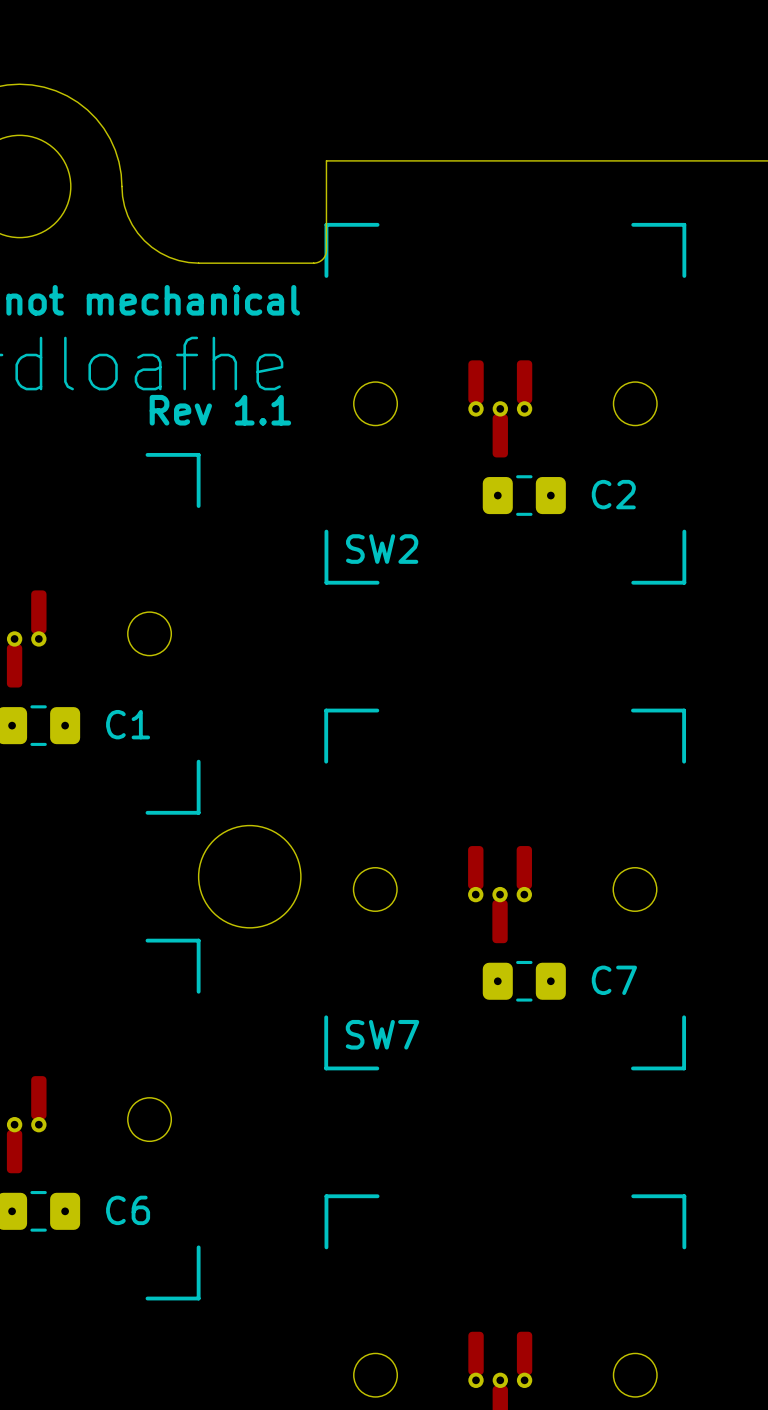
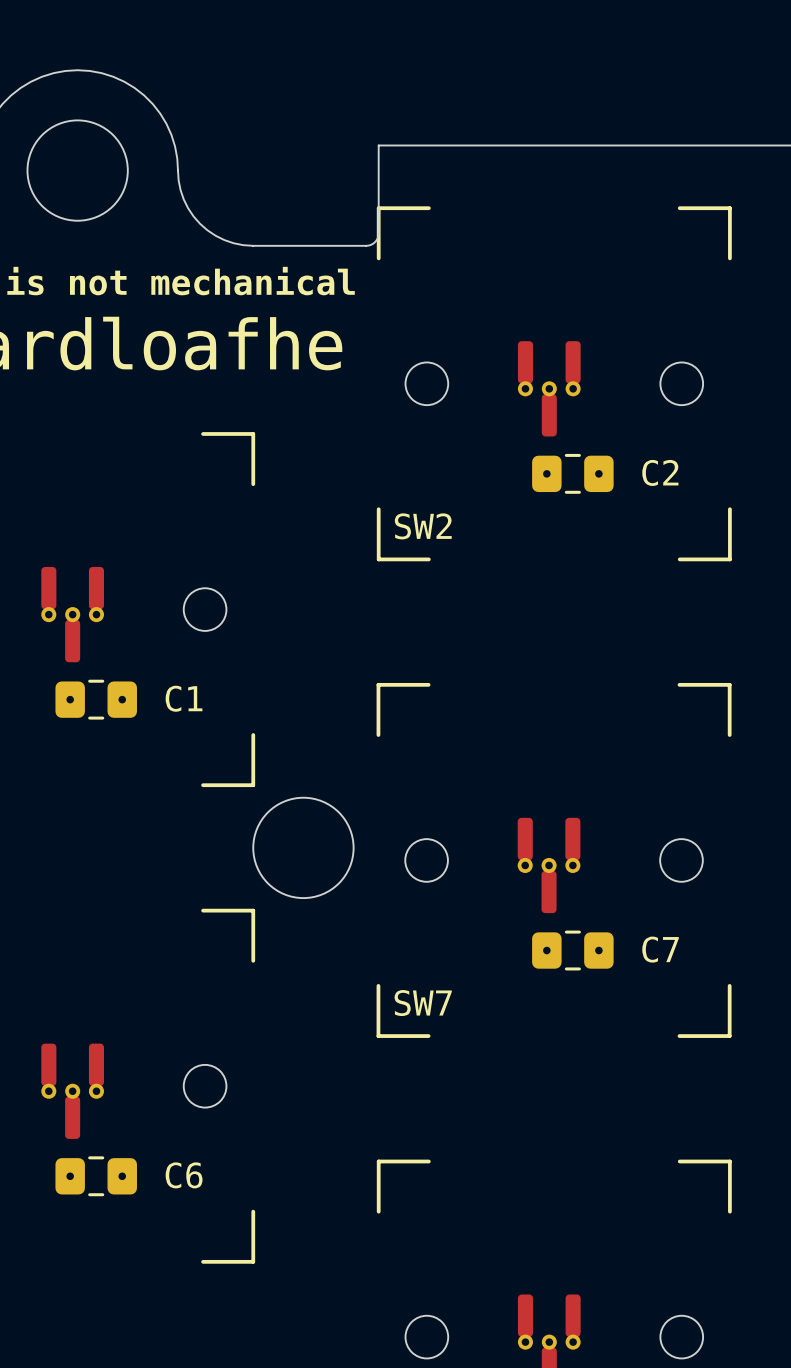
text: Rev 1.1 (220, 410) -> none

